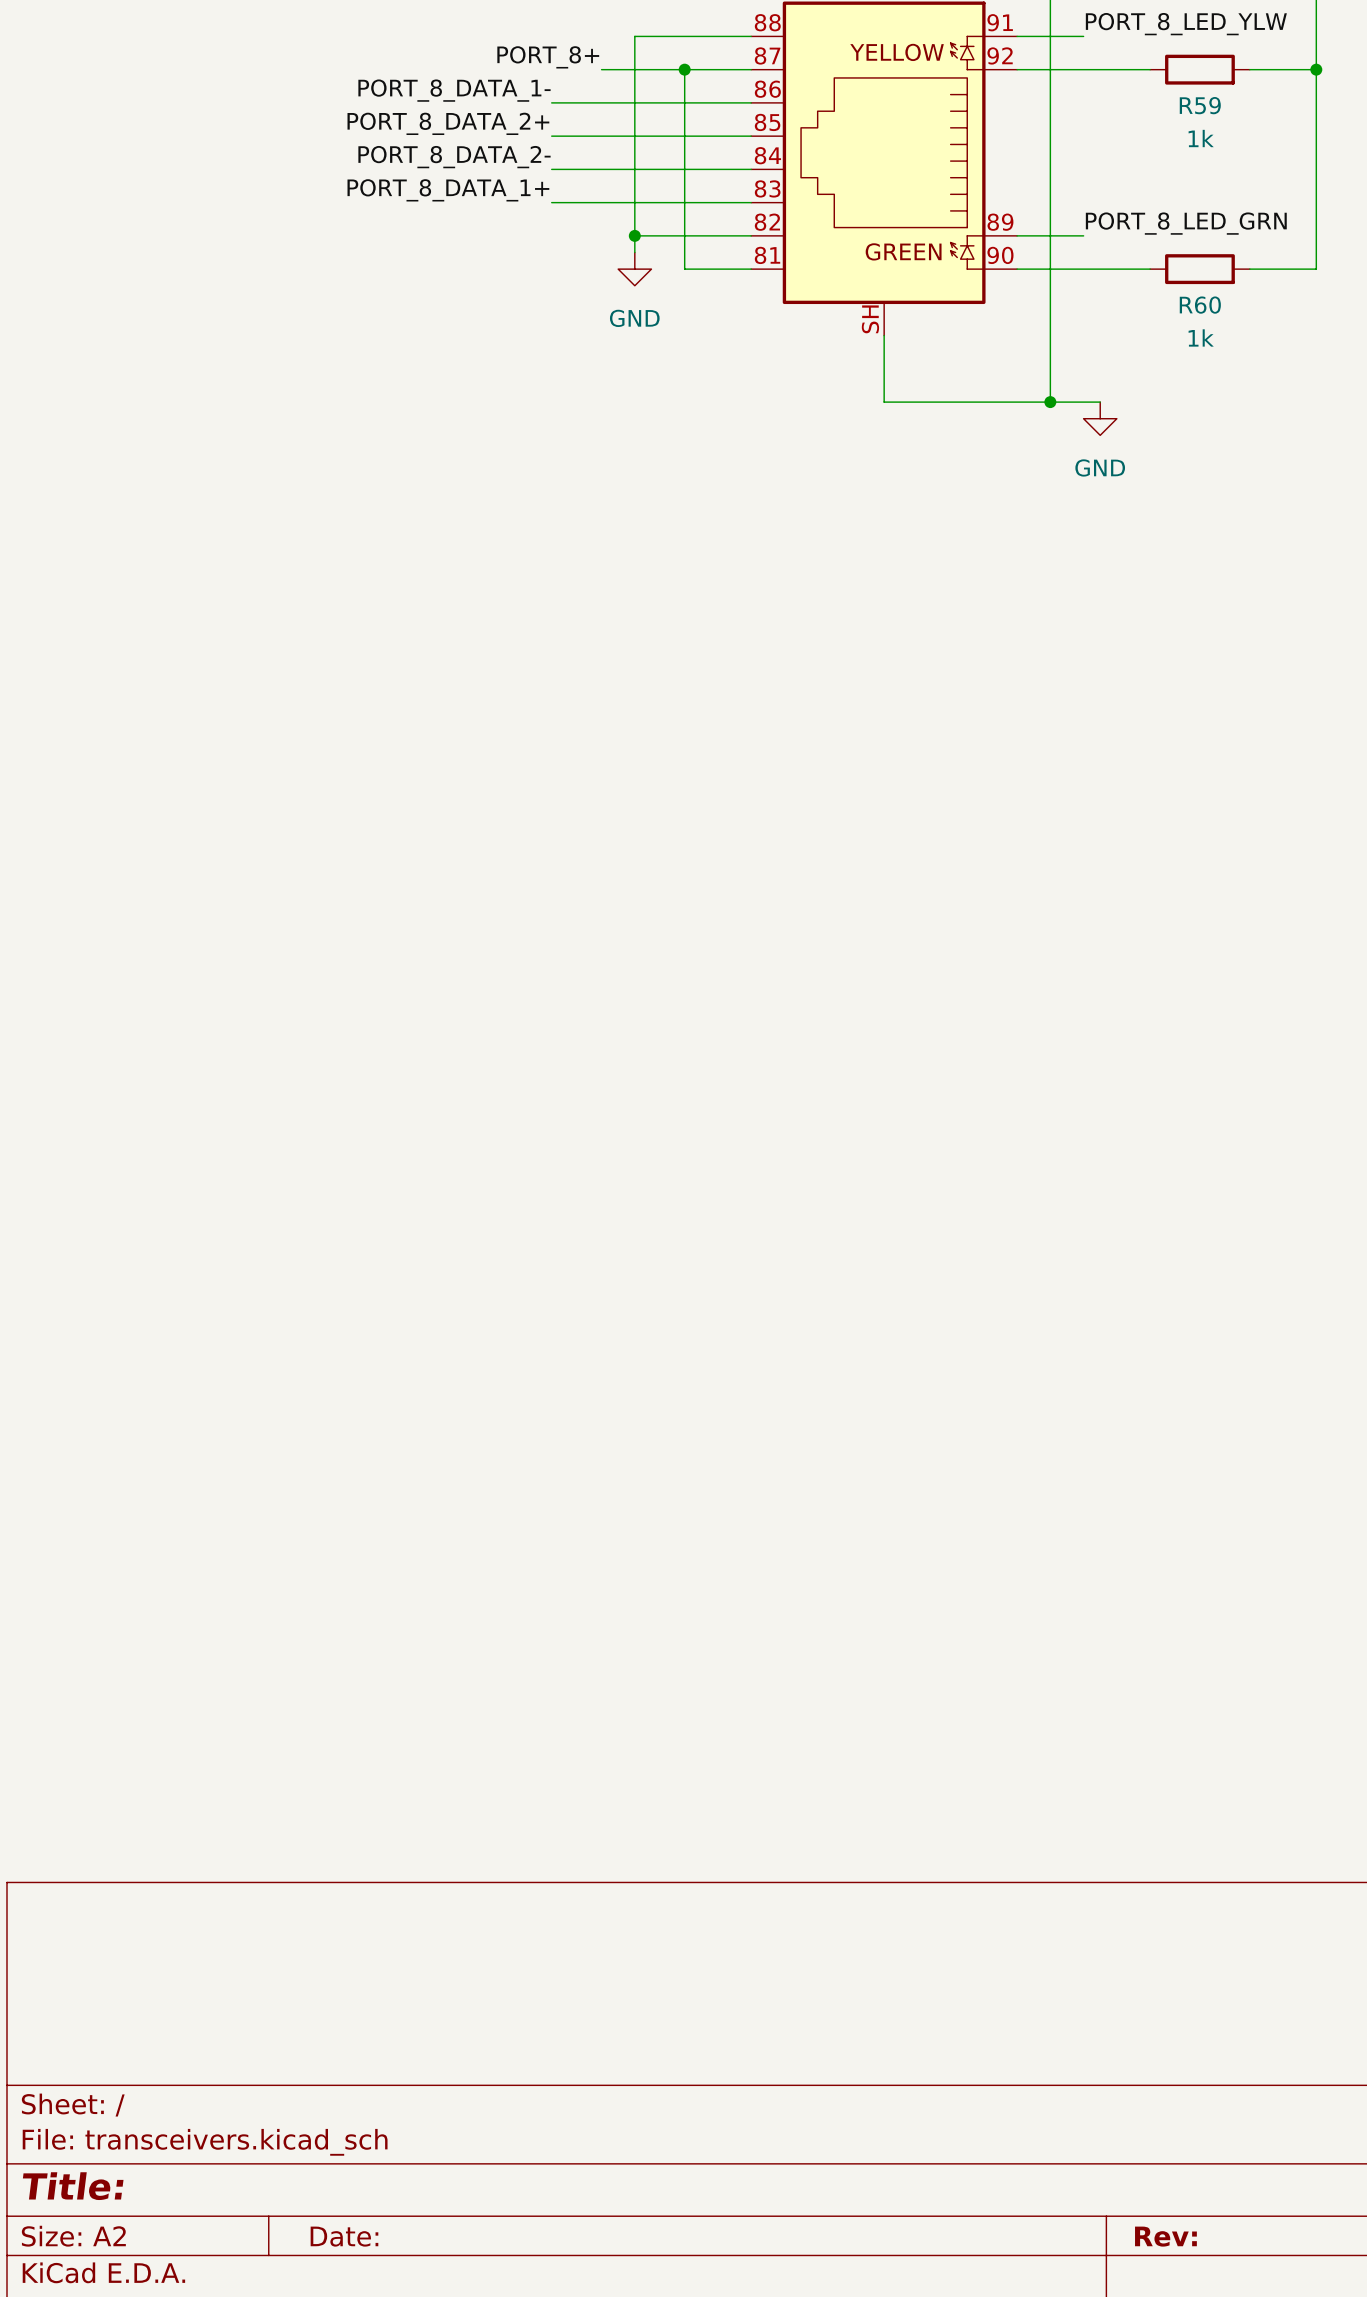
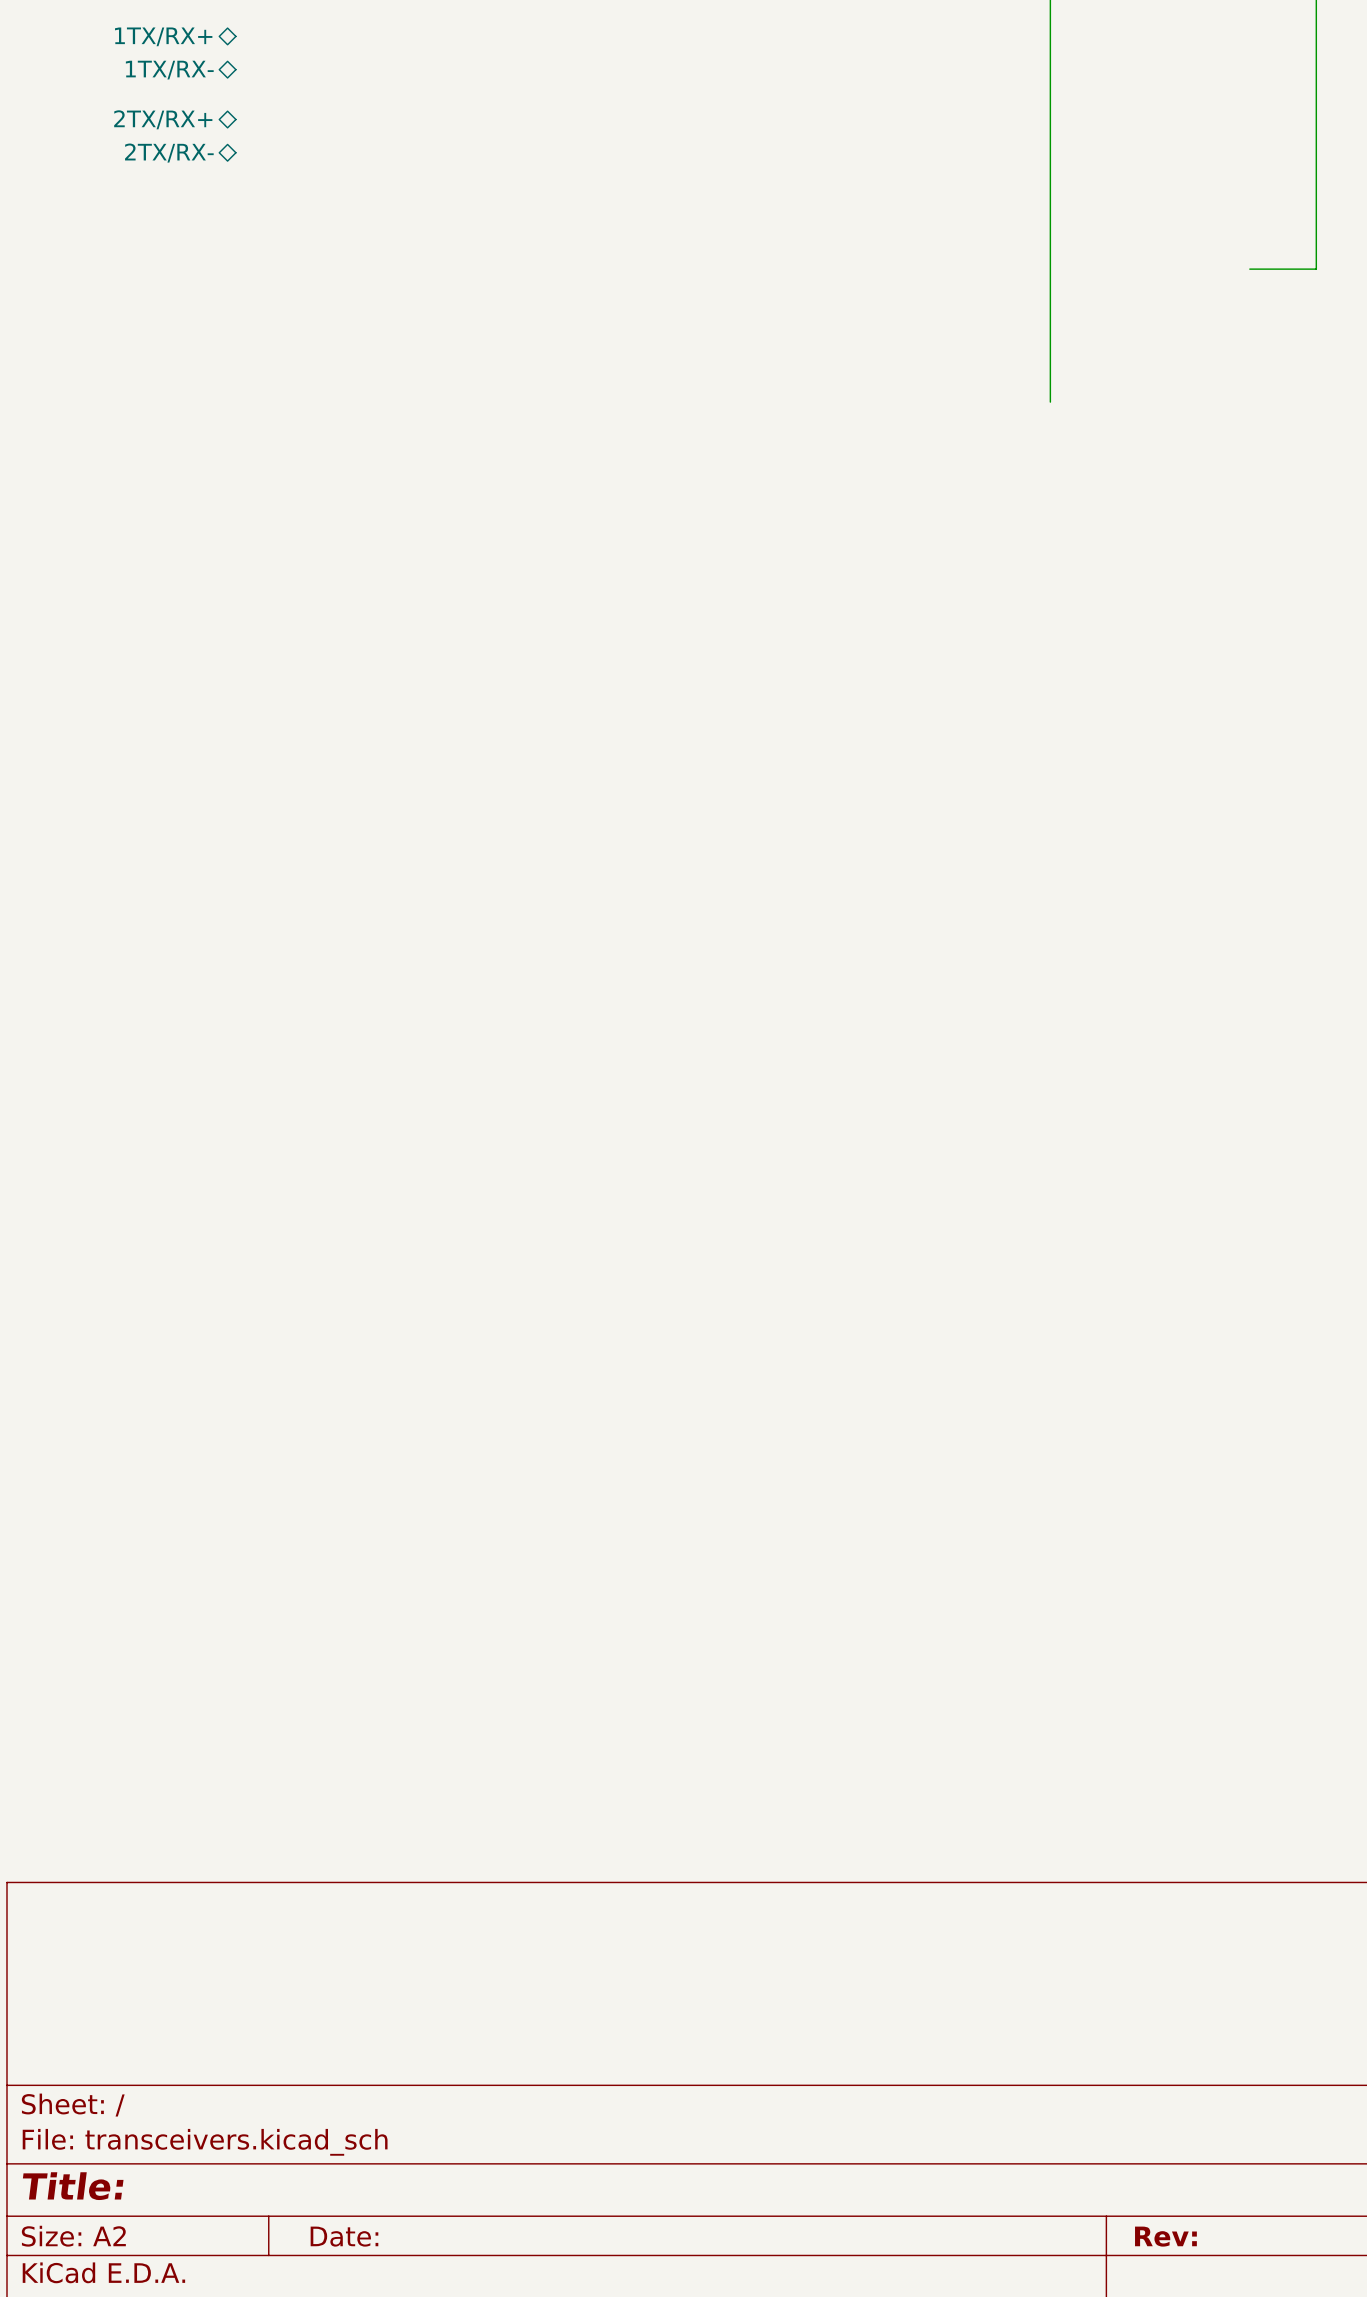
label: PORT_8_LED_YLW (1186, 24) -> none
sheet pin: none -> 1TX/RX+ (163, 36)
wire: (751, 36) (634, 36) (634, 252) -> none
wire: (1017, 36) (1083, 36) -> none
label: PORT_8+ (548, 57) -> none
wire: (601, 69) (751, 69) -> none
wire: (684, 69) (684, 269) (751, 269) -> none
junction: (684, 69) -> none
wire: (1017, 69) (1150, 69) -> none
R59: 1k (1199, 69) -> none
wire: (1249, 69) (1316, 69) -> none
junction: (1316, 69) -> none
sheet pin: none -> 1TX/RX- (169, 70)
label: PORT_8_DATA_1- (454, 90) -> none
wire: (551, 102) (751, 102) -> none
sheet pin: none -> 2TX/RX+ (163, 119)
label: PORT_8_DATA_2+ (448, 123) -> none
wire: (551, 136) (751, 136) -> none
sheet pin: none -> 2TX/RX- (169, 153)
label: PORT_8_DATA_2- (454, 157) -> none
part: (884, 168) -> none
wire: (551, 169) (751, 169) -> none
label: PORT_8_DATA_1+ (448, 190) -> none
wire: (551, 202) (751, 202) -> none
label: PORT_8_LED_GRN (1186, 223) -> none
wire: (634, 235) (751, 235) -> none
junction: (634, 235) -> none
wire: (1017, 235) (1083, 235) -> none
power symbol: GND (634, 269) -> none
wire: (1017, 269) (1150, 269) -> none
R60: 1k (1199, 269) -> none
wire: (884, 335) (884, 402) (1100, 402) -> none
junction: (1050, 402) -> none
power symbol: GND (1100, 418) -> none

